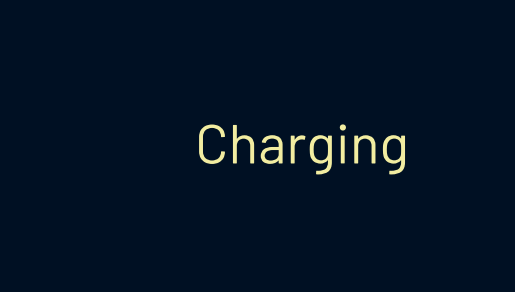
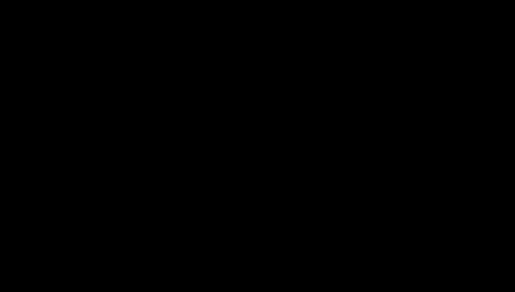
text: Charging (302, 149) -> none

